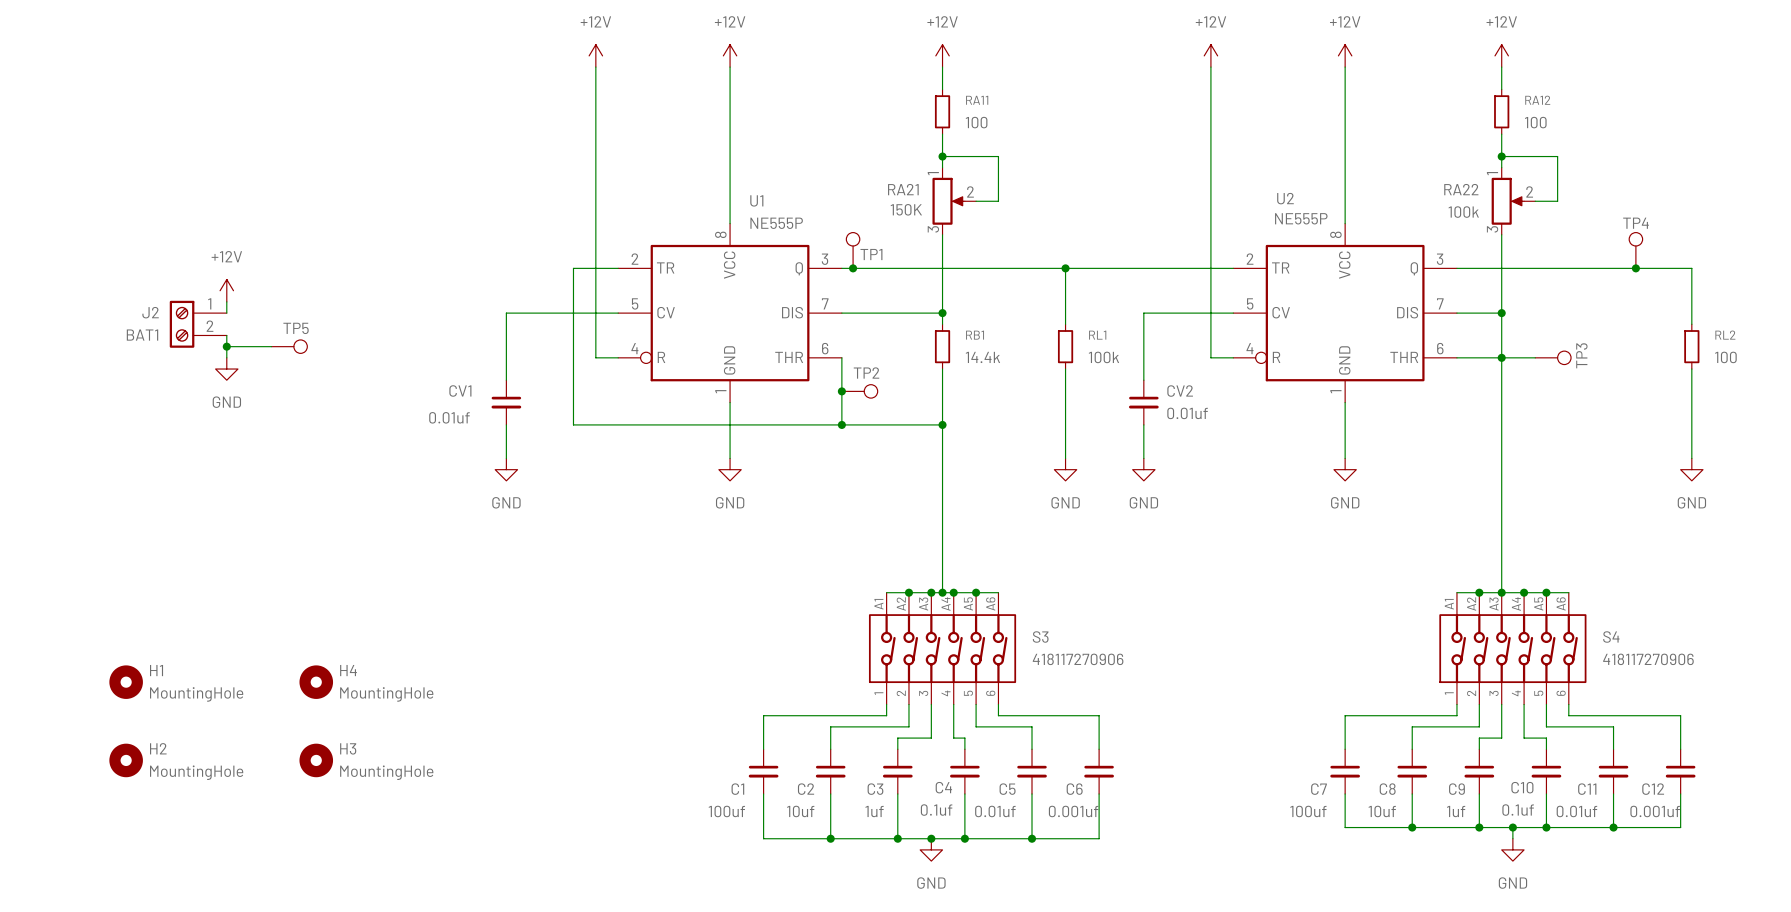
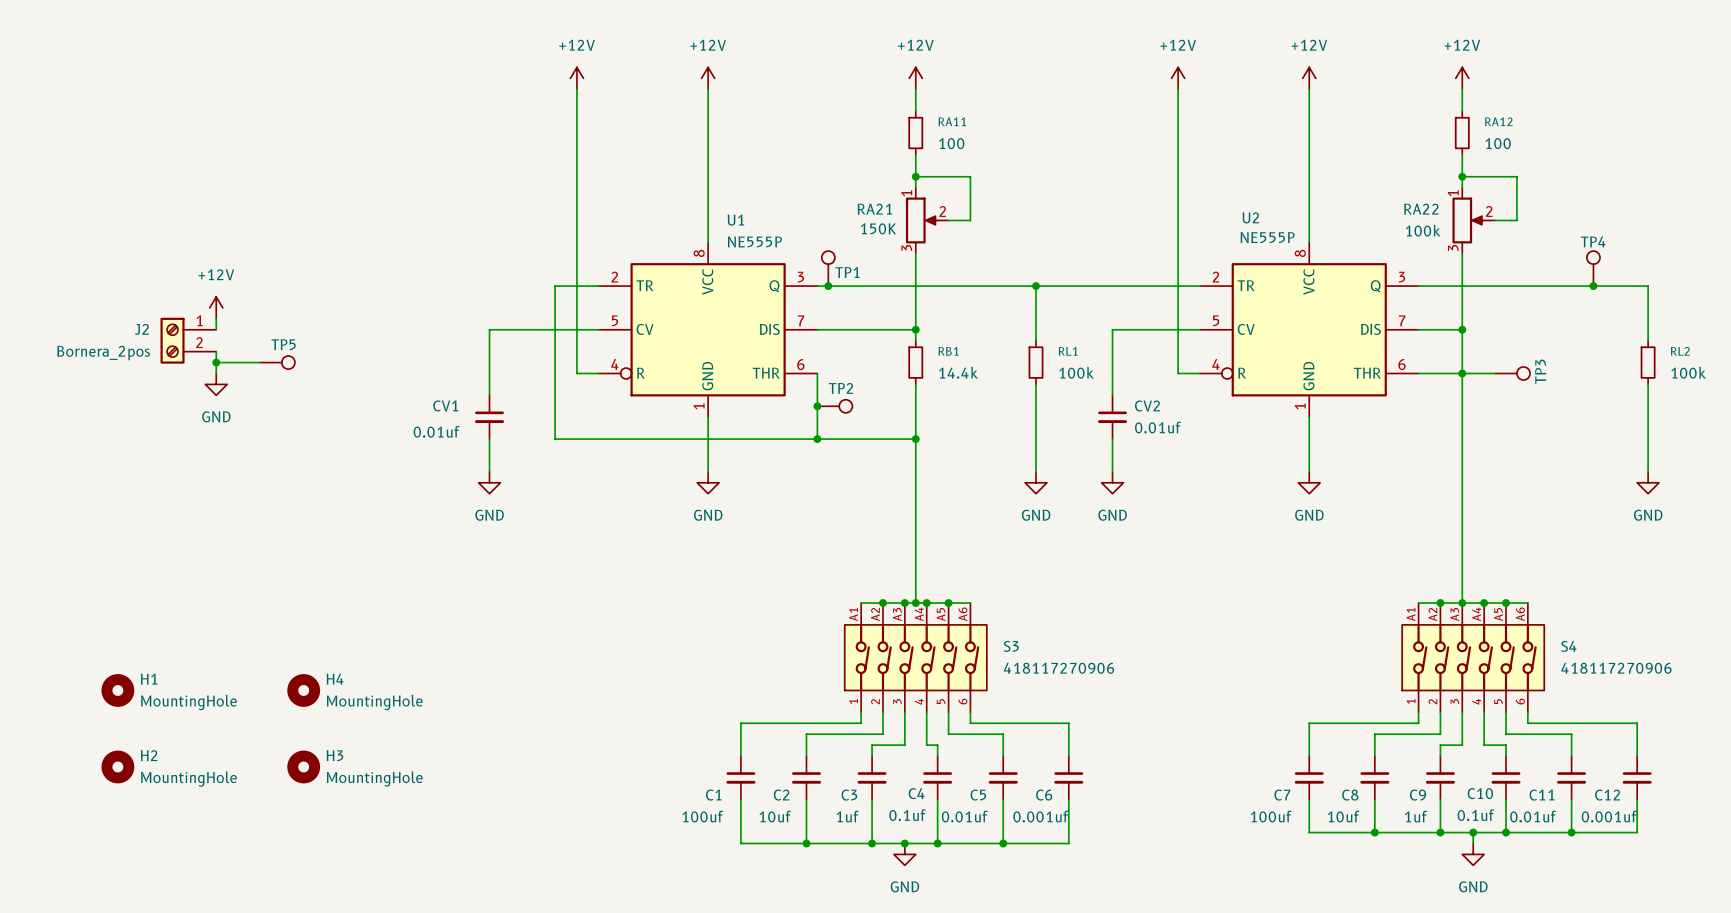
J2 value: BAT1 (142, 335) -> Bornera_2pos (103, 353)
RL2 value: 100 (1725, 357) -> 100k (1688, 372)

